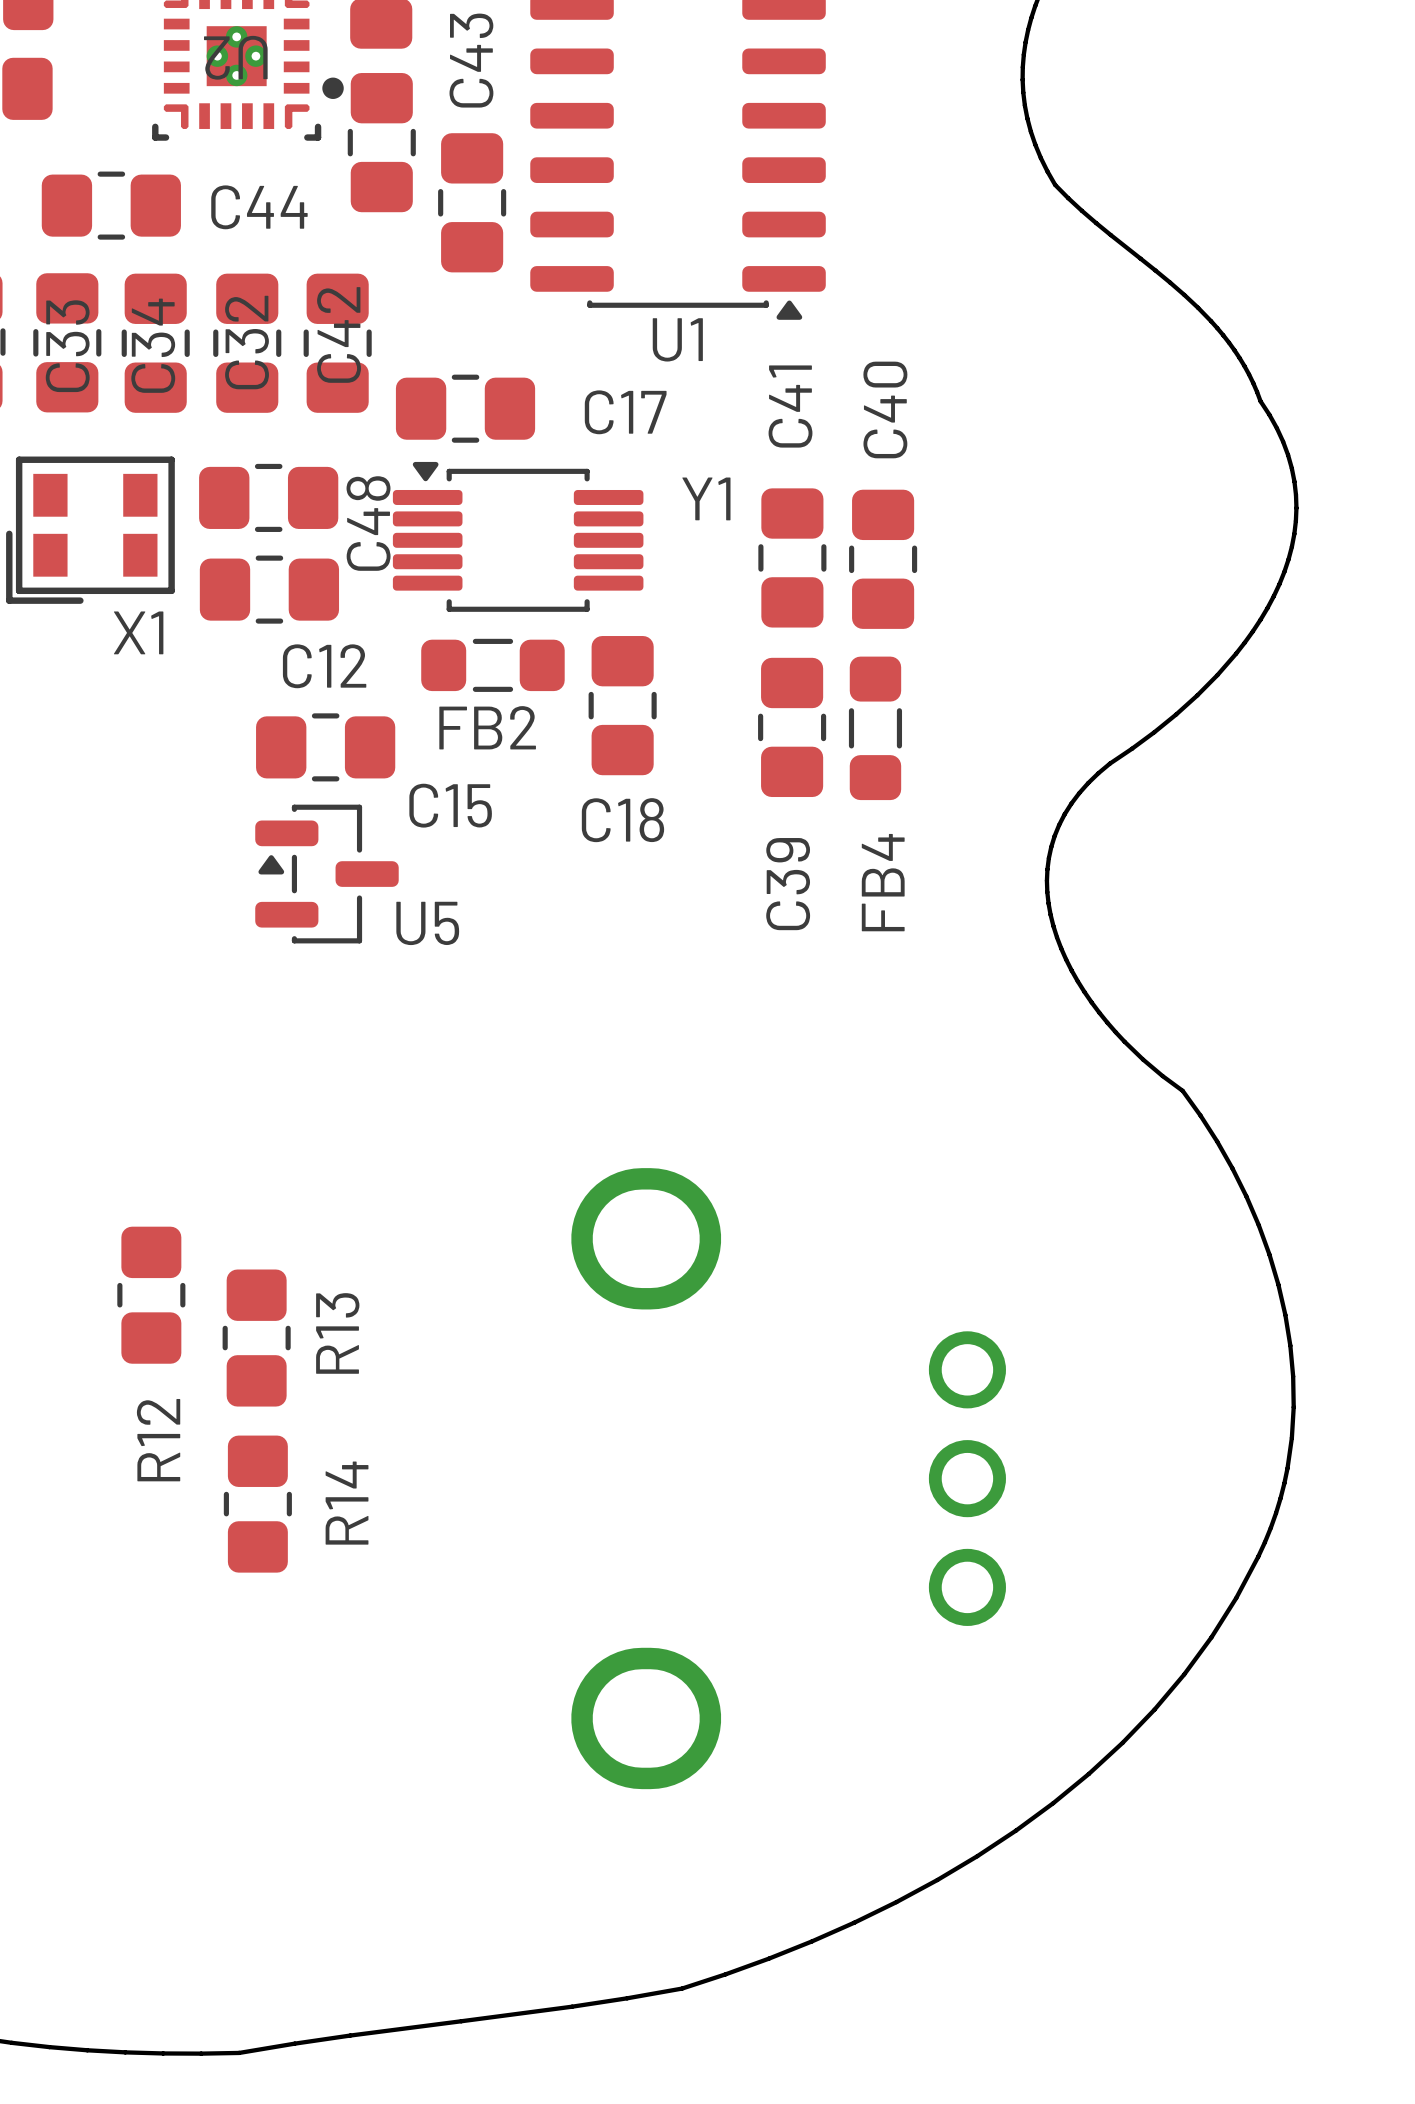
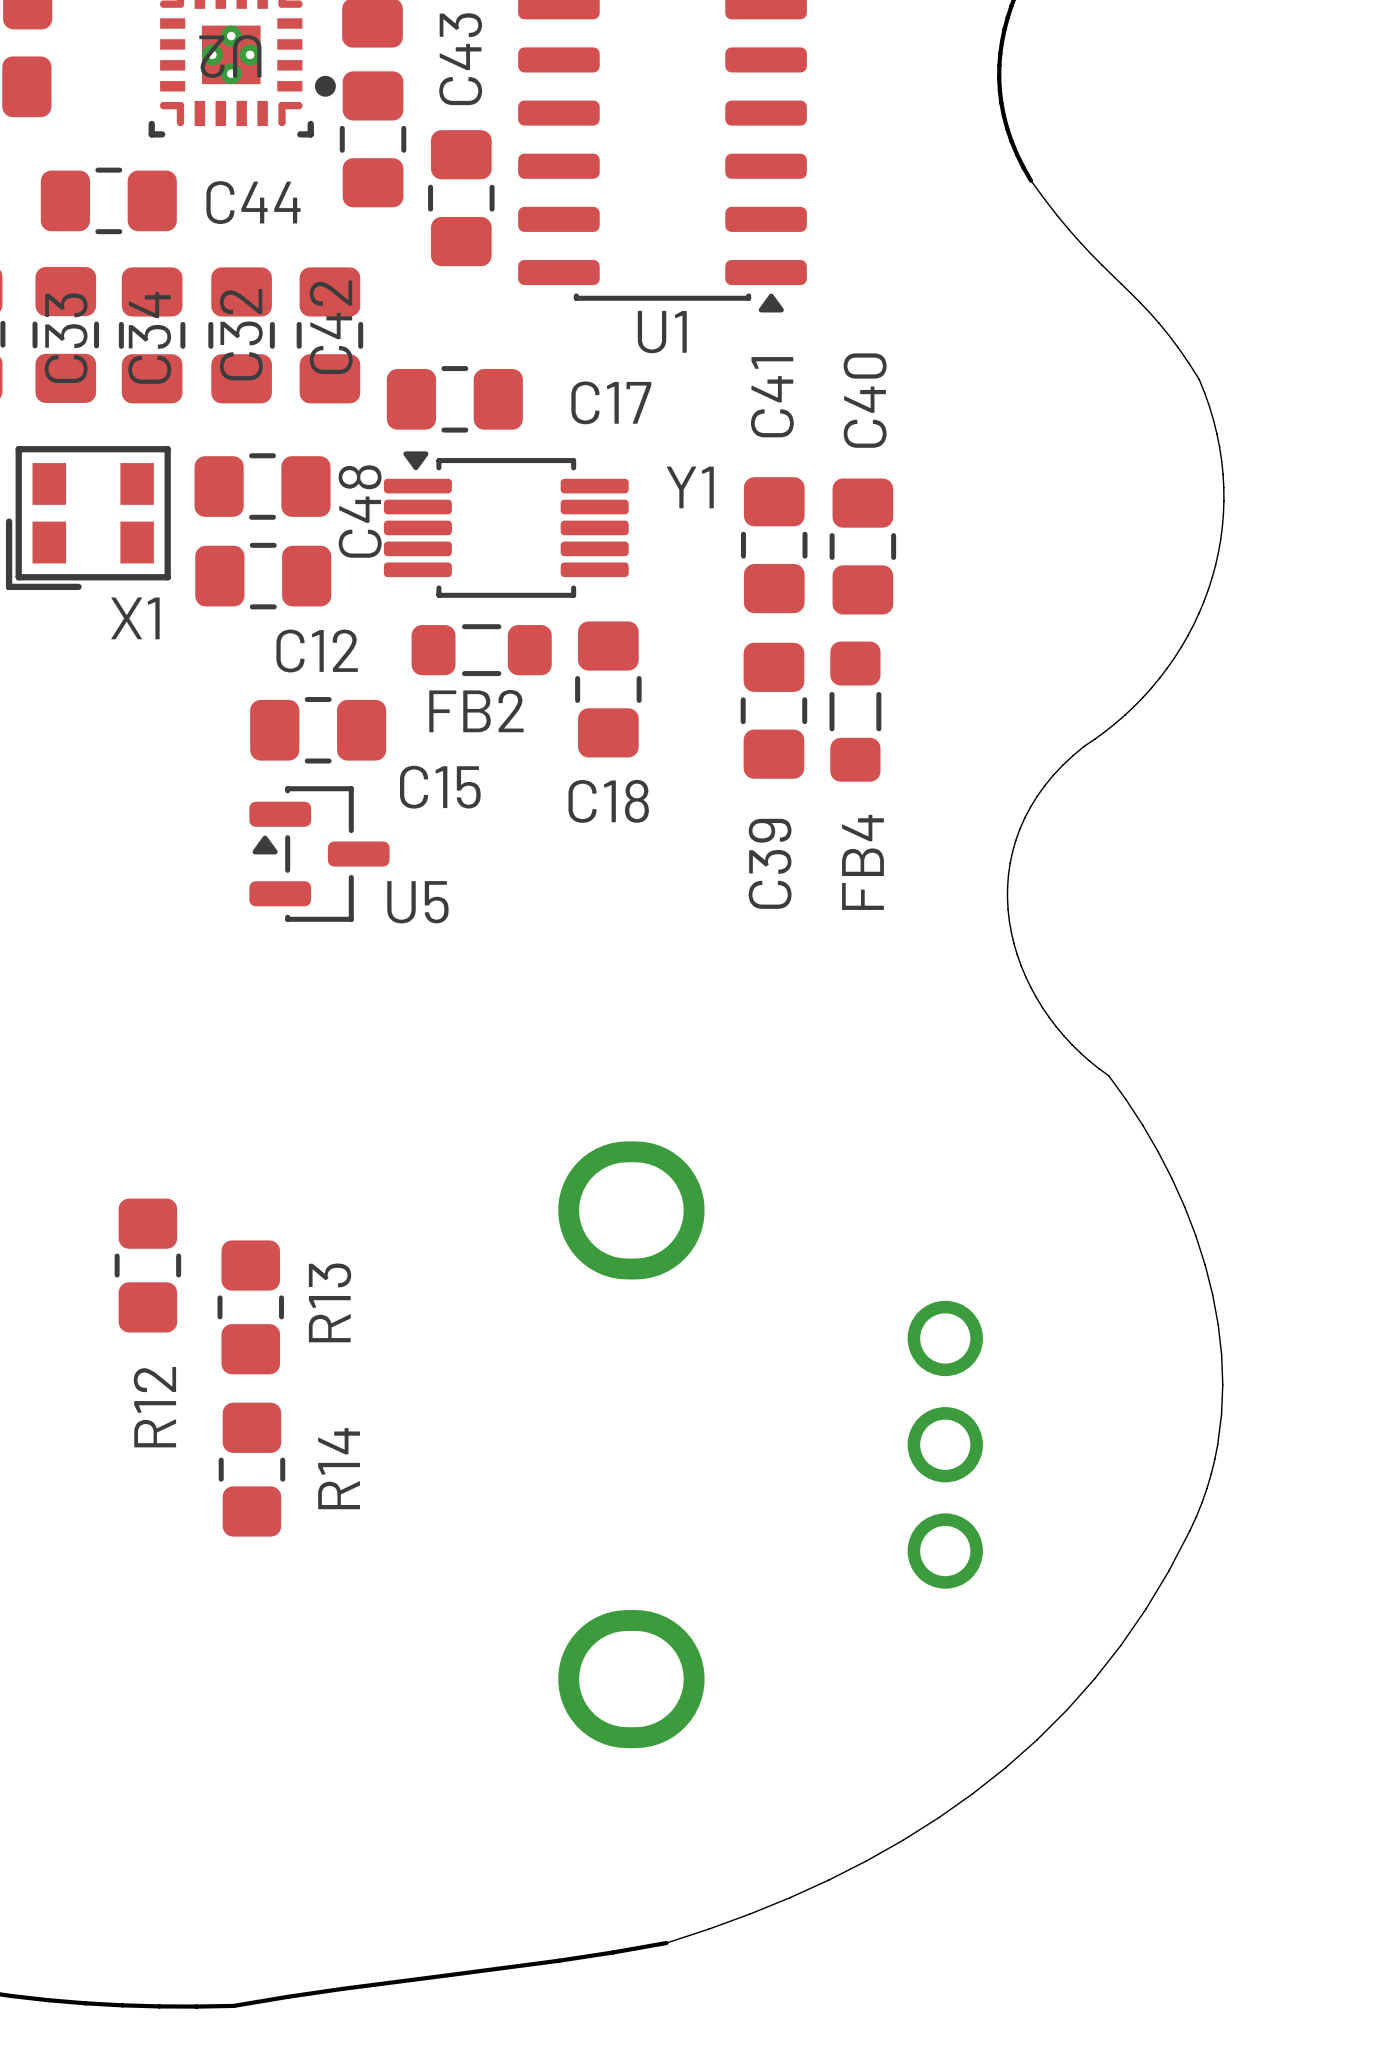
board edge: (1055, 184) (1096, 223) (1184, 294) (1223, 335) (1244, 366) (1260, 401) (1276, 428) (1288, 455) (1294, 481) (1296, 508) (1291, 546) (1279, 584) (1260, 619) (1236, 653) (1197, 695) (1154, 732) (1109, 763) (1079, 793) (1064, 814) (1054, 835) (1048, 858) (1046, 880) (1048, 903) (1053, 926) (1061, 948) (1077, 981) (1099, 1012) (1124, 1041) (1143, 1059) (1182, 1090) (1217, 1141) (1232, 1168) (1258, 1225) (1278, 1284) (1290, 1345) (1293, 1407) (1287, 1468) (1276, 1513) (1264, 1542) (1236, 1598) (1211, 1637) (1184, 1674) (1154, 1709) (1088, 1773) (1016, 1830) (977, 1856) (896, 1902) (812, 1941) (769, 1958) (682, 1988) -> (1031, 180) (1080, 242) (1158, 323) (1188, 362) (1199, 379) (1209, 406) (1221, 460) (1223, 500) (1220, 539) (1212, 577) (1193, 624) (1174, 657) (1143, 697) (1115, 723) (1073, 755) (1053, 775) (1037, 796) (1024, 818) (1015, 840) (1010, 863) (1007, 897) (1013, 943) (1021, 965) (1036, 997) (1064, 1036) (1089, 1061) (1108, 1075) (1126, 1099) (1158, 1151) (1172, 1179) (1195, 1235) (1212, 1294) (1221, 1354) (1221, 1414) (1214, 1459) (1196, 1516) (1168, 1571) (1145, 1609) (1094, 1678) (1066, 1710) (1005, 1767) (938, 1817) (866, 1860) (789, 1897) (749, 1914) (666, 1943)

